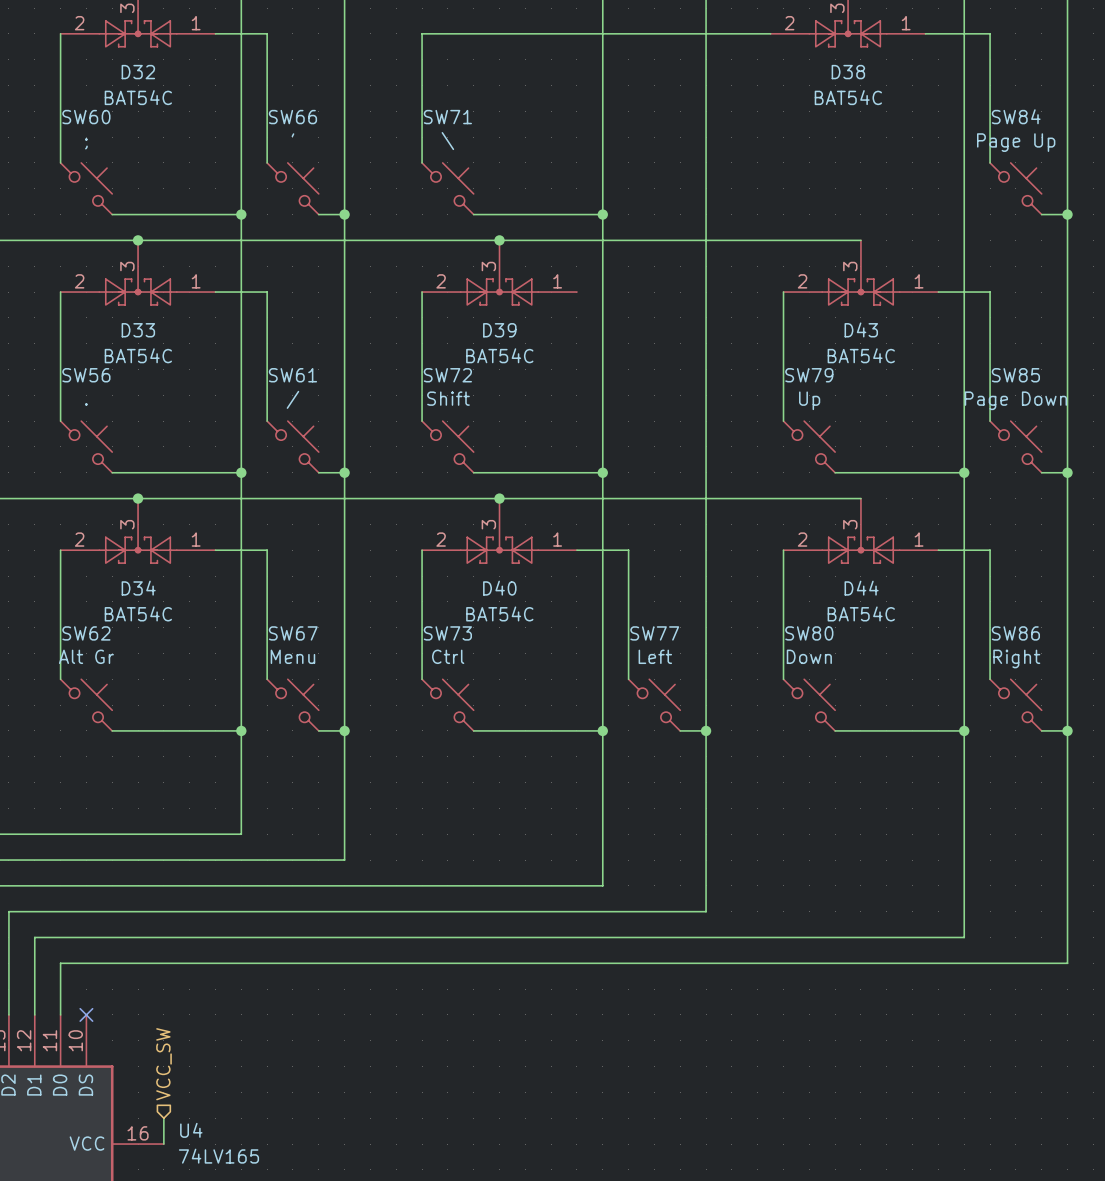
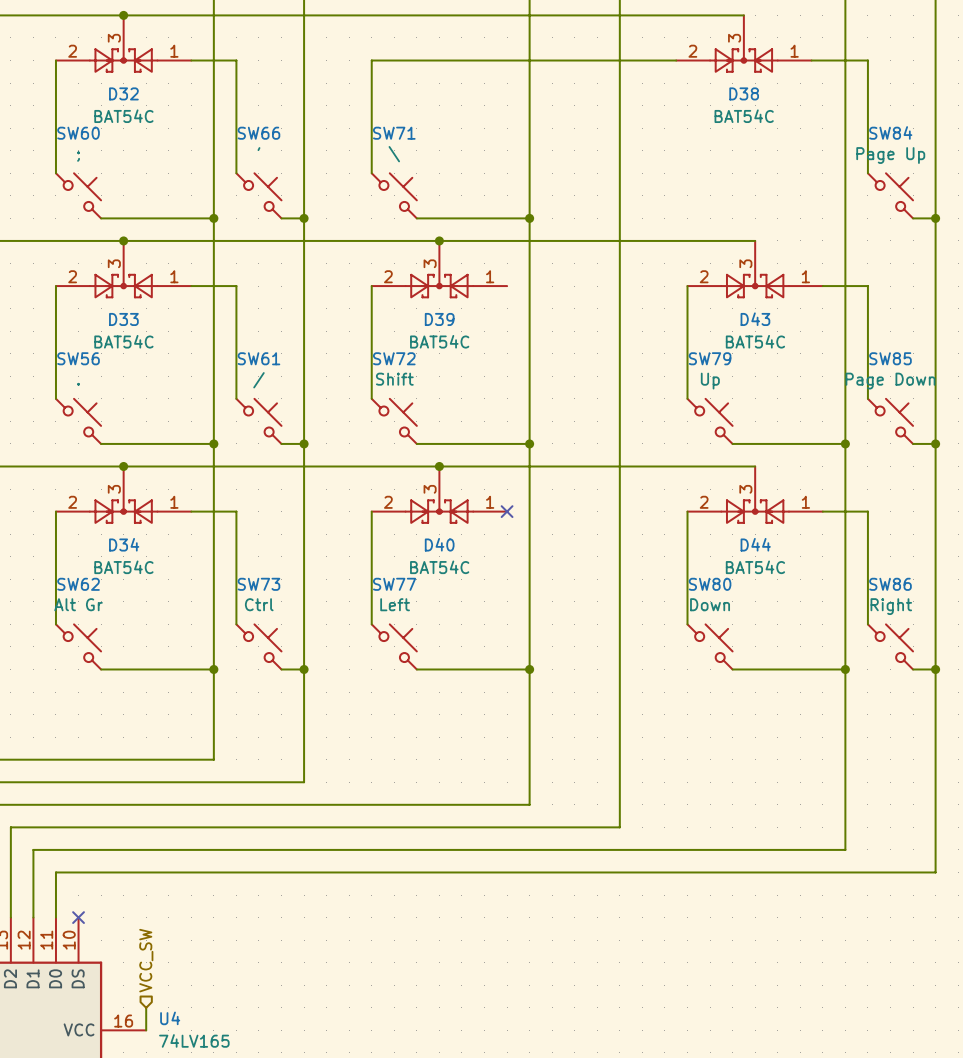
wire: (576, 550) (628, 550) (628, 679) -> none
no-connect mark: none -> (507, 511)
SW67 name: SW67 (293, 633) -> SW73 (258, 584)
SW73 name: SW73 (447, 633) -> SW77 (394, 584)
SW67 value: Menu (292, 656) -> Ctrl (259, 604)
SW73 value: Ctrl (448, 656) -> Left (395, 604)
SW77: Left (654, 705) -> none
wire: (680, 730) (706, 730) -> none
junction: (706, 730) -> none

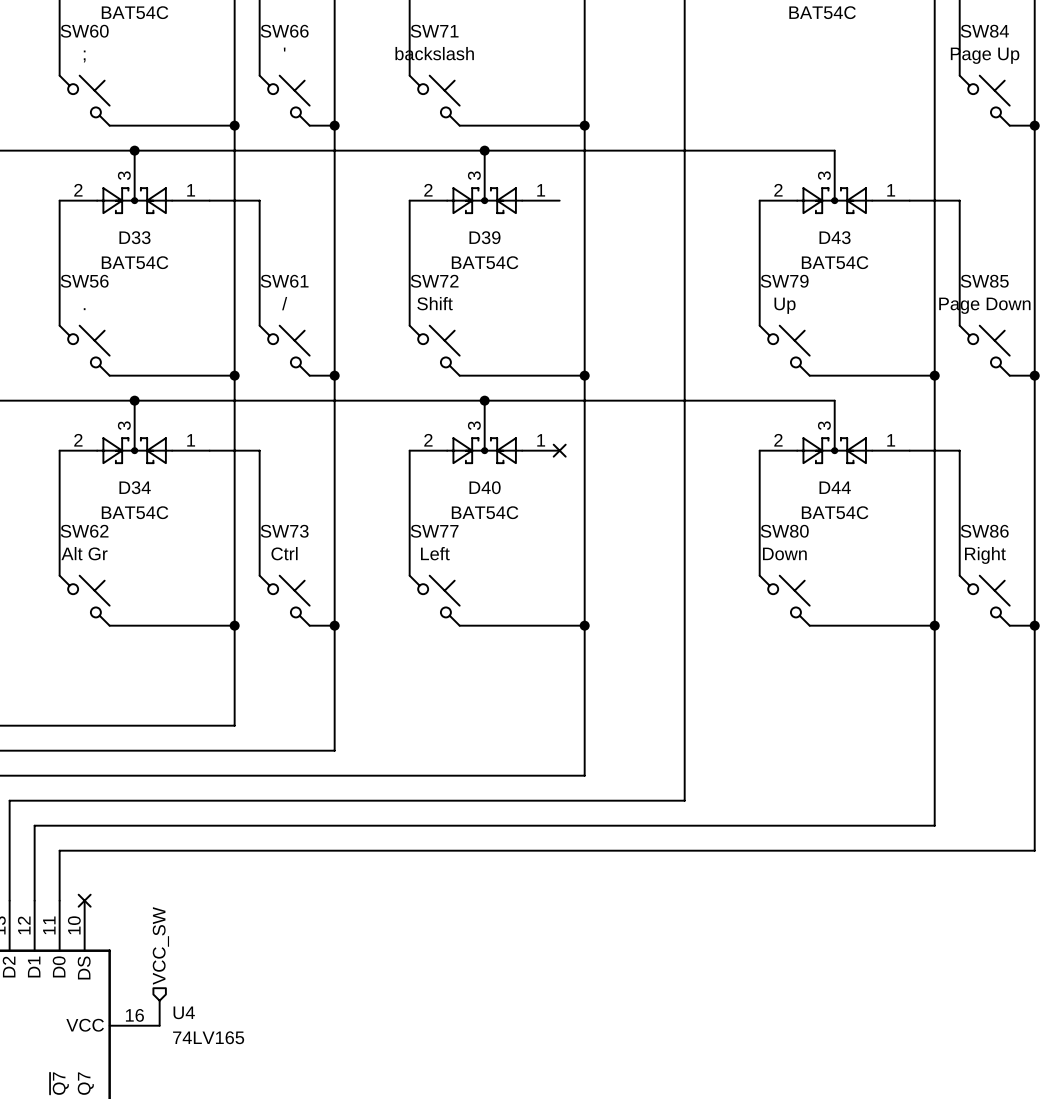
SW71 value: \ (394, 154) -> backslash (434, 53)

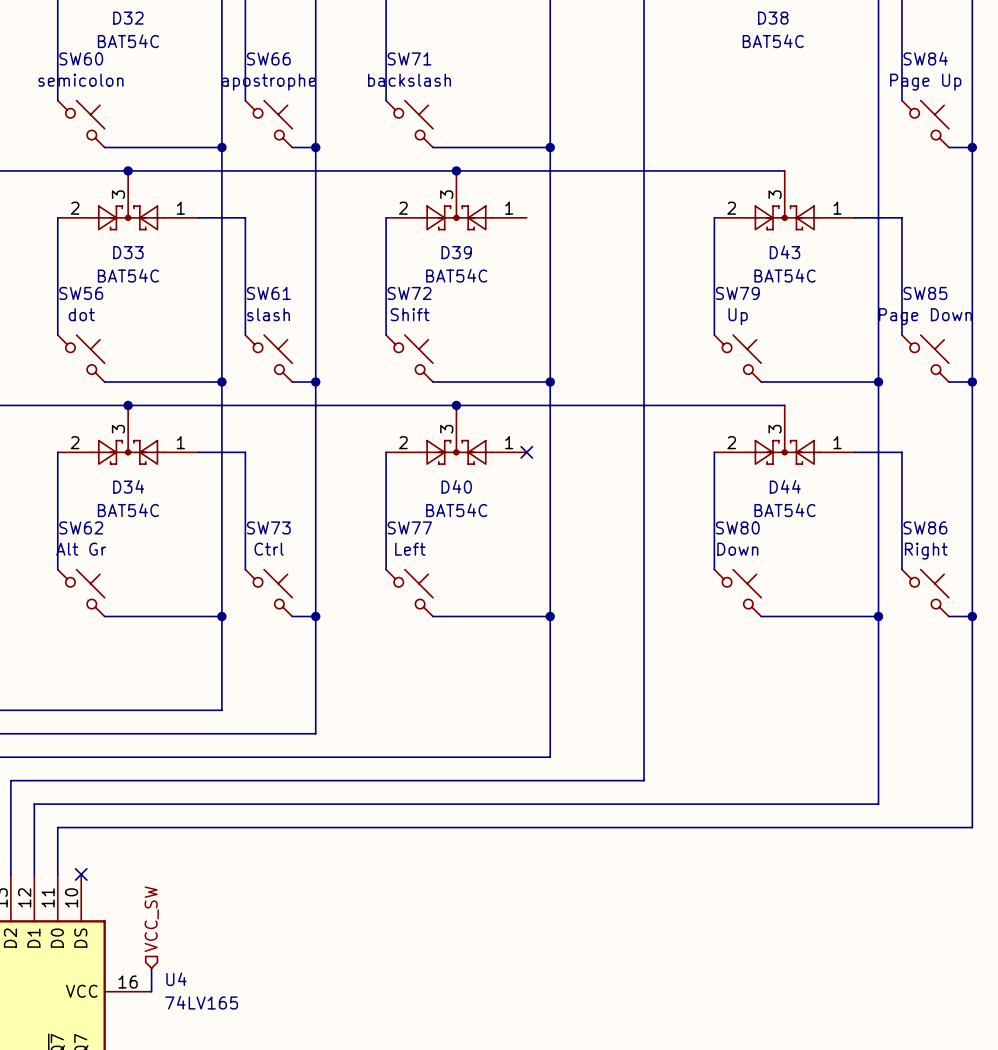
SW66 value: ' (284, 49) -> apostrophe (268, 82)
SW60 value: ; (84, 56) -> semicolon (80, 80)
SW61 value: / (284, 303) -> slash (268, 314)
SW56 value: . (84, 309) -> dot (81, 314)

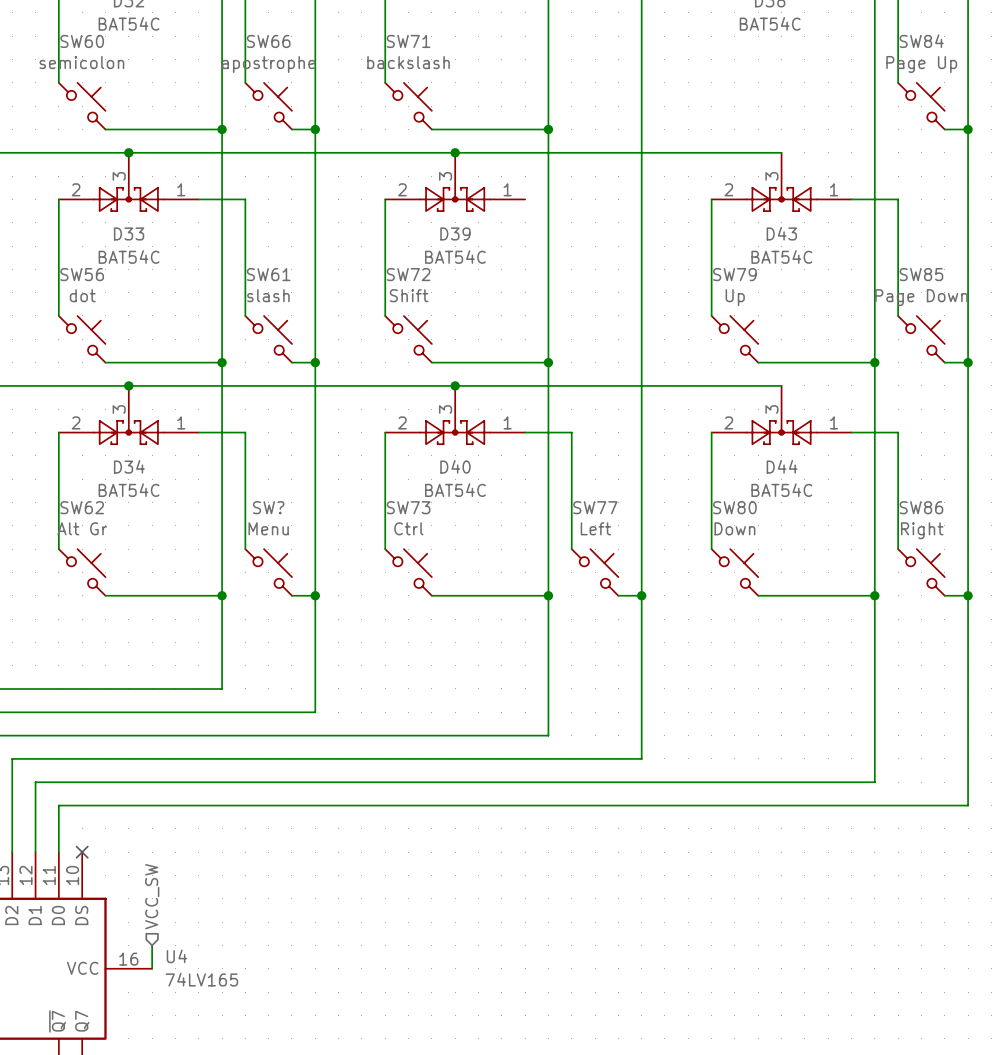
wire: none -> (525, 432) (571, 432) (571, 549)
no-connect mark: (526, 452) -> none
SW73 name: SW73 (268, 527) -> SW? (268, 507)
SW77 name: SW77 (409, 527) -> SW73 (408, 507)
SW73 value: Ctrl (269, 549) -> Menu (268, 528)
SW77 value: Left (410, 549) -> Ctrl (408, 528)
SW77: none -> Left (595, 572)
wire: none -> (618, 595) (641, 595)
junction: none -> (641, 595)

